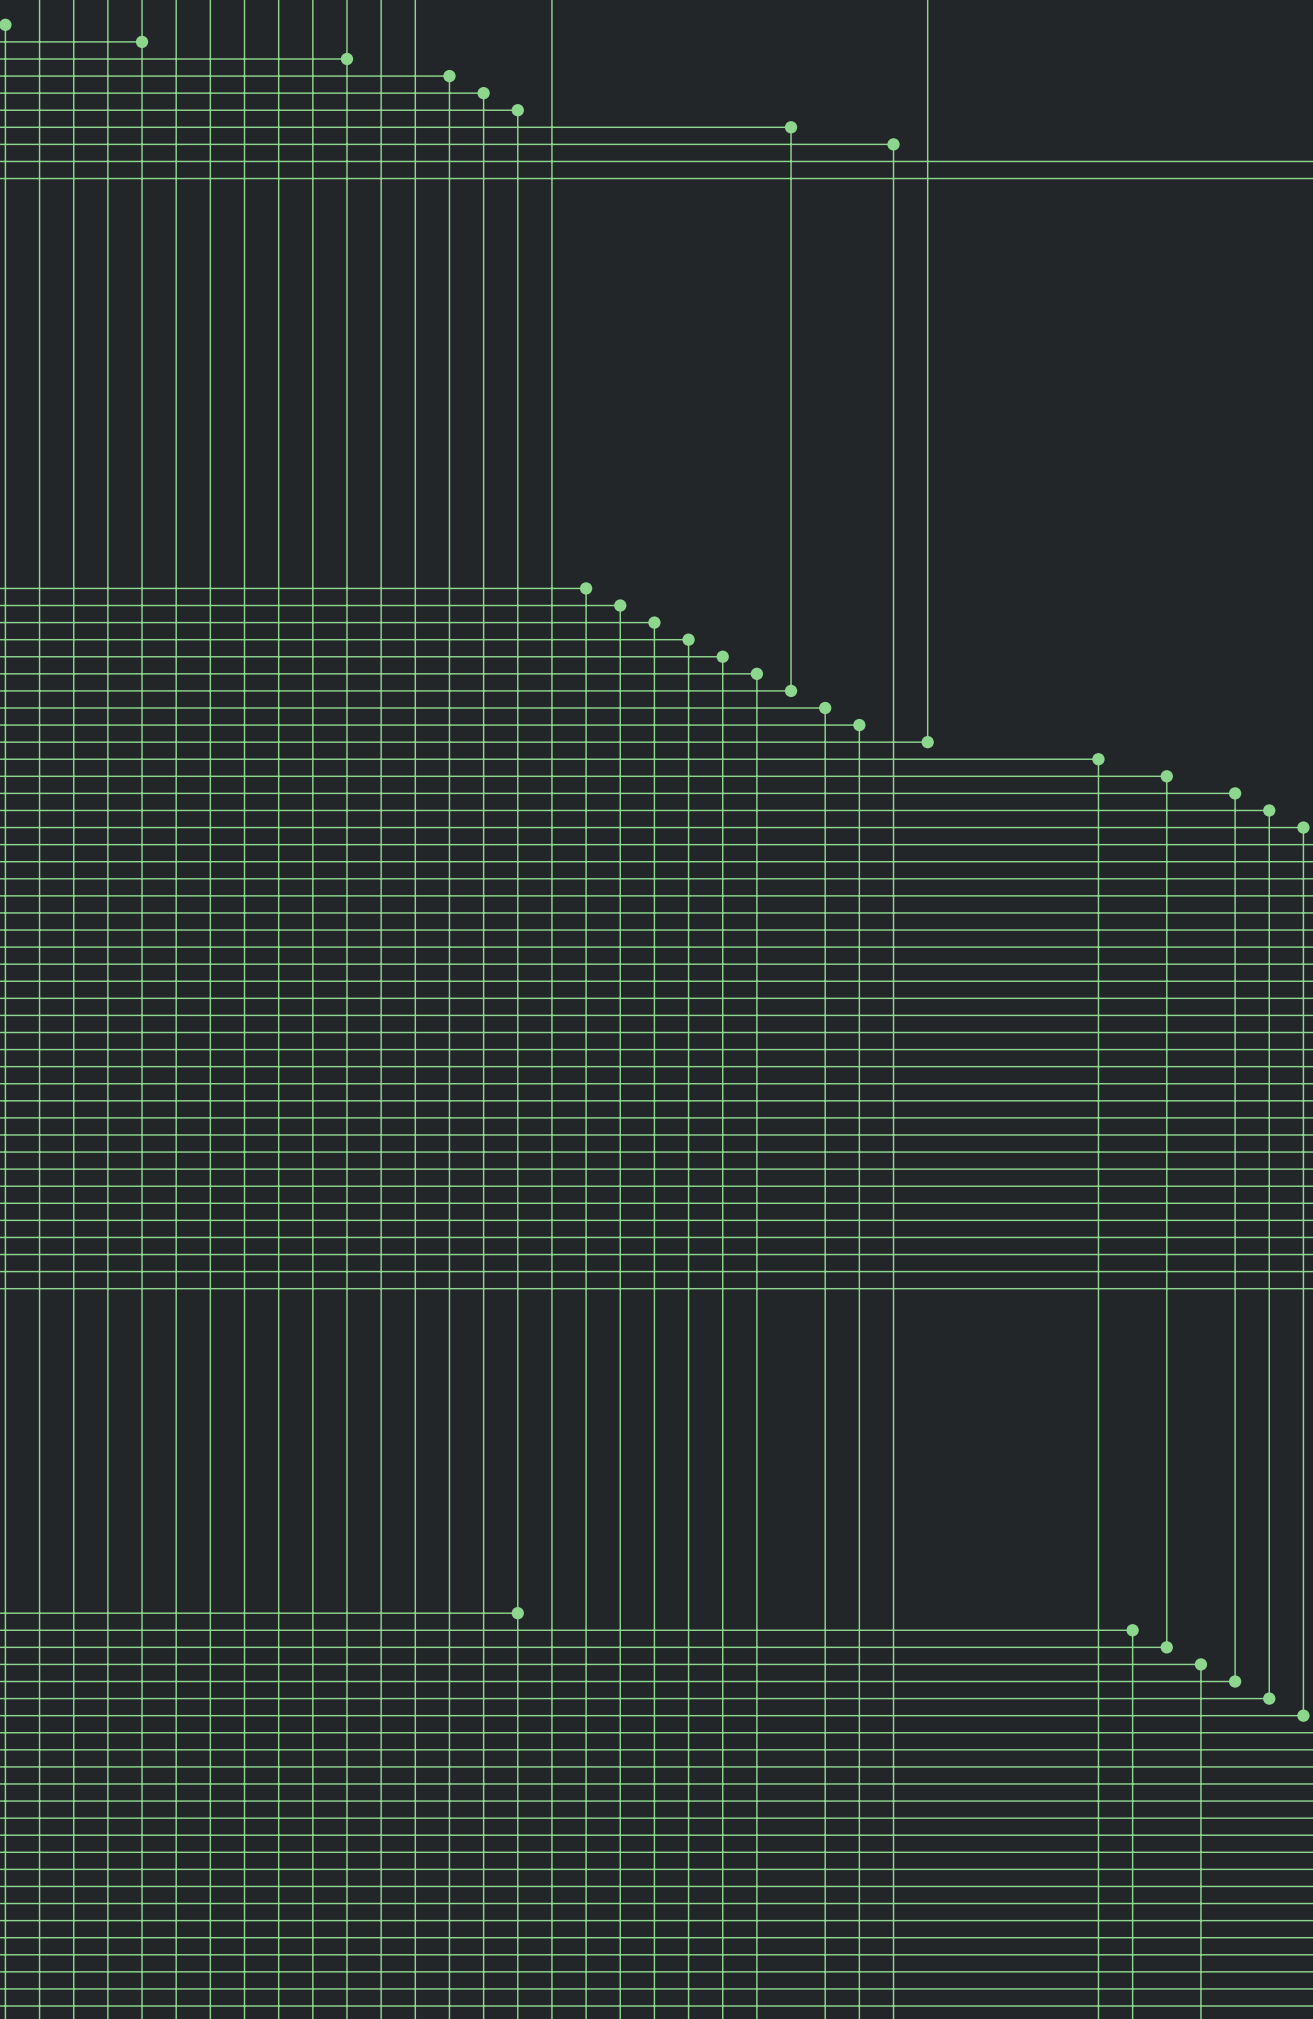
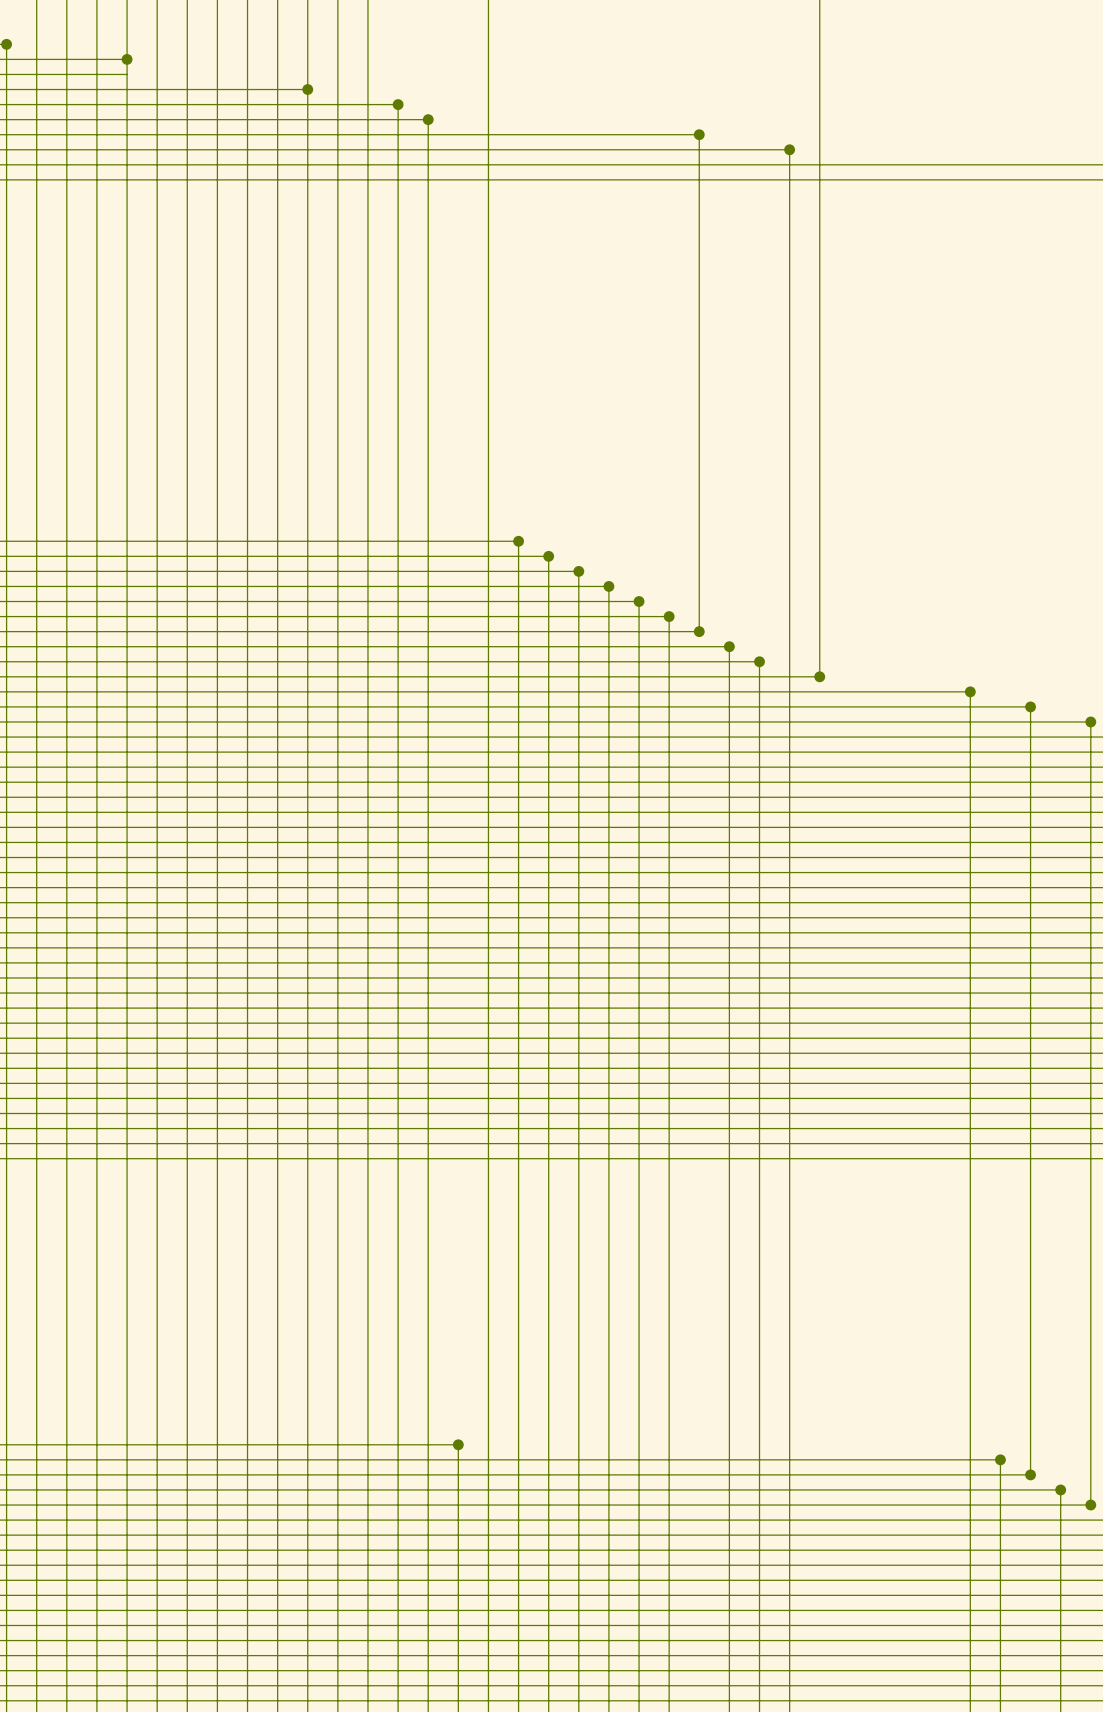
wire: (142, 58) (346, 58) -> none
junction position: (346, 58) -> (307, 89)
wire: (346, 76) (449, 76) (449, 93) (483, 93) (483, 110) (517, 110) (517, 1613) -> none
junction: (449, 76) -> none
junction: none -> (398, 104)
junction: (483, 93) -> none
junction: none -> (428, 119)
junction: (517, 110) -> none

